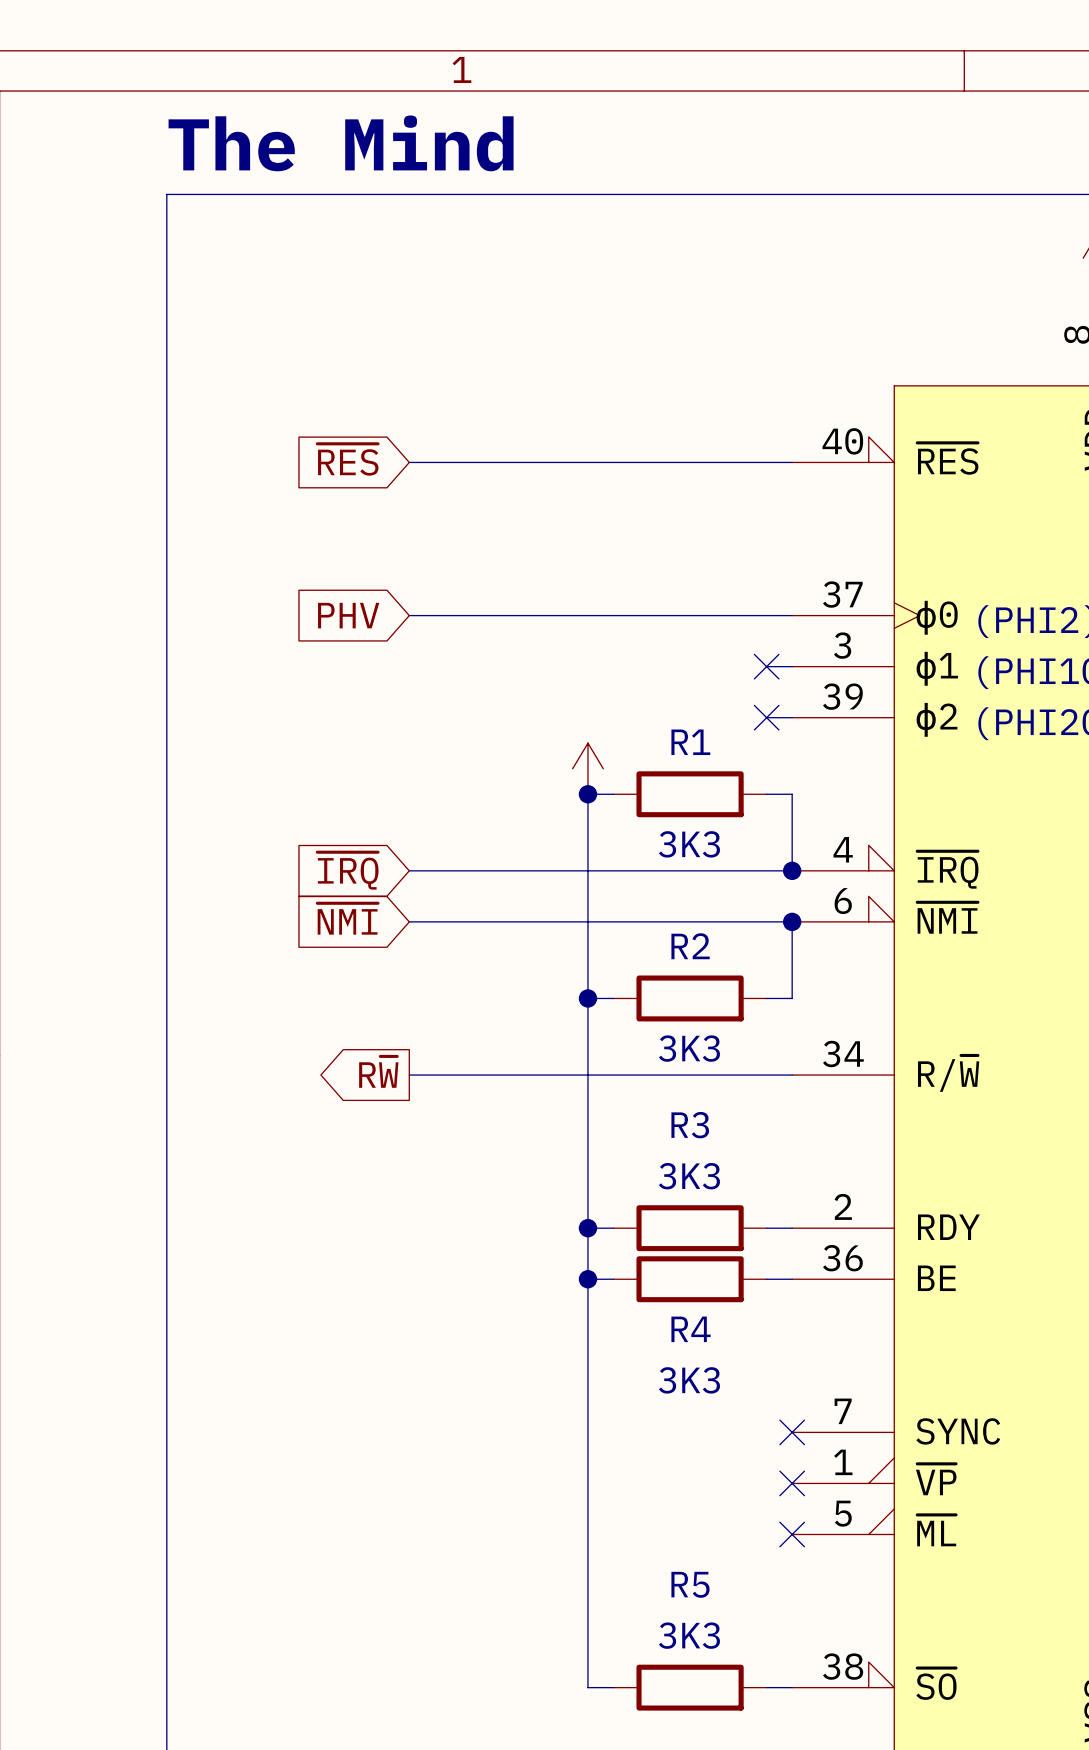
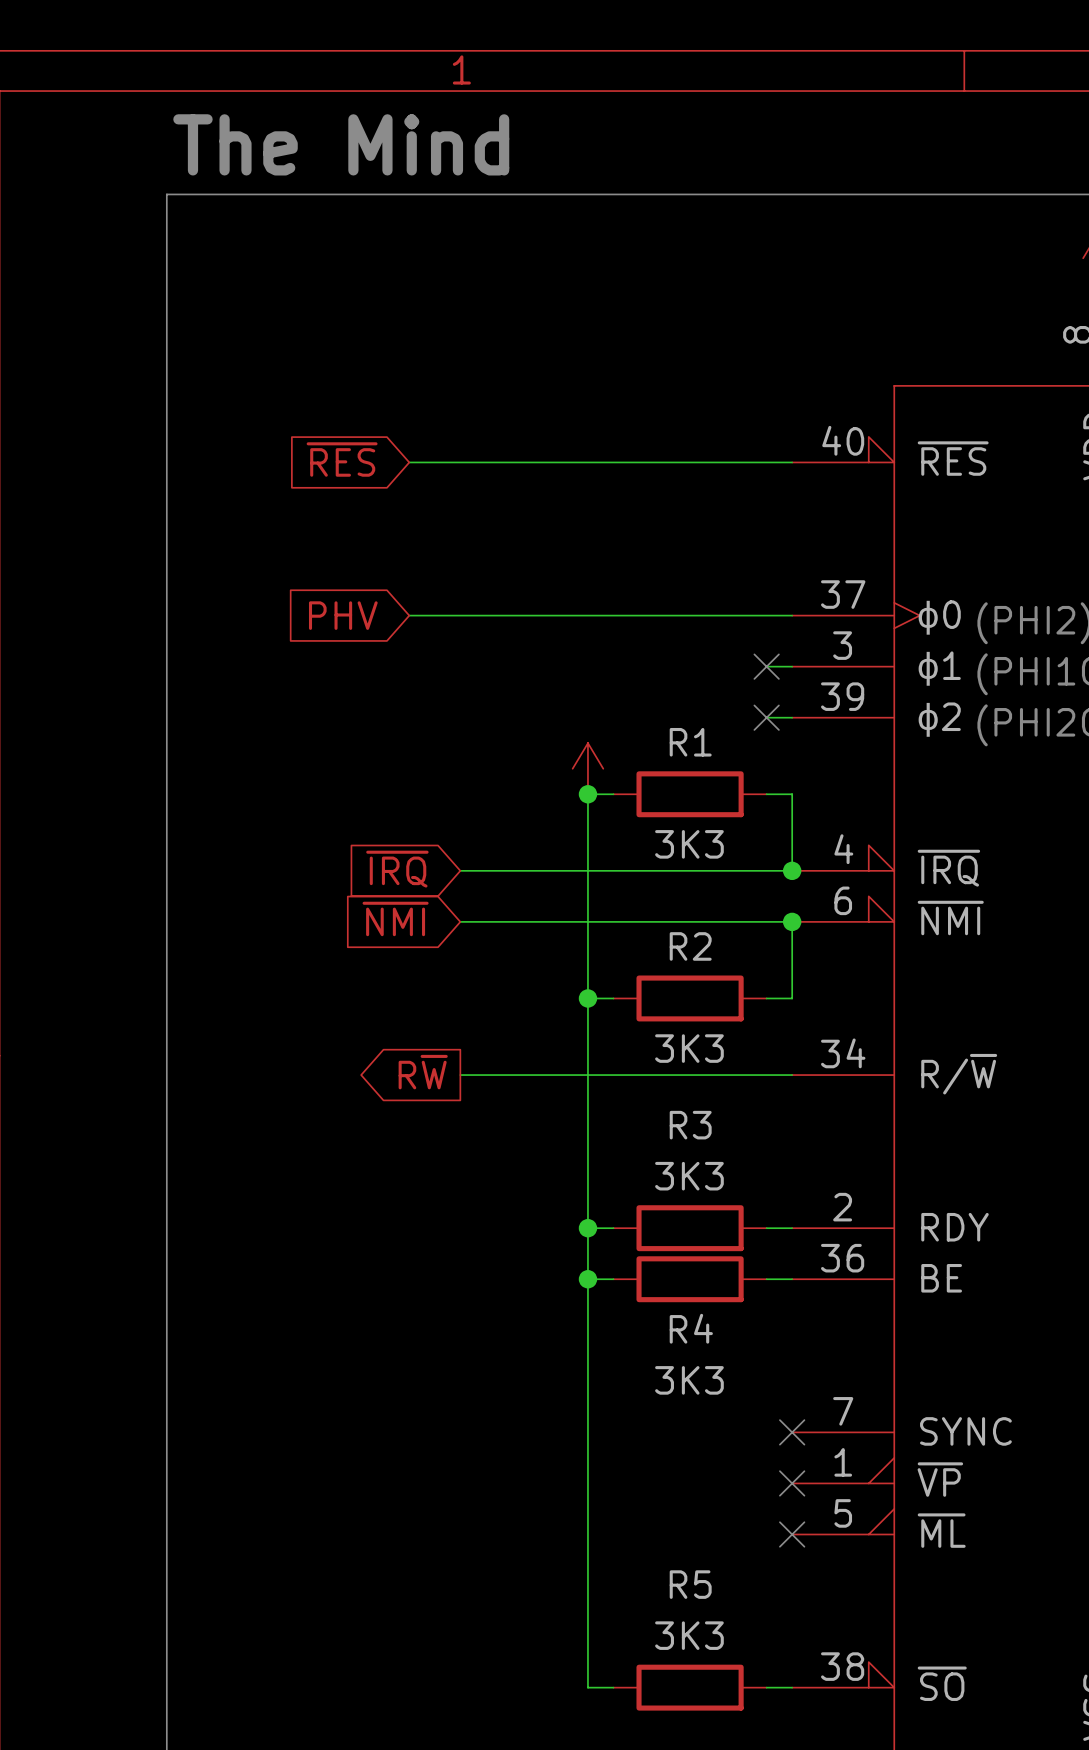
global label position: ~{IRQ} (347, 870) -> ~{IRQ} (397, 869)
wire: (409, 870) (460, 870) -> none
global label position: ~{NMI} (347, 918) -> ~{NMI} (395, 918)
wire: (409, 921) (460, 921) -> none
global label position: R~{W} (378, 1072) -> R~{W} (423, 1072)
wire: (409, 1075) (460, 1075) -> none

